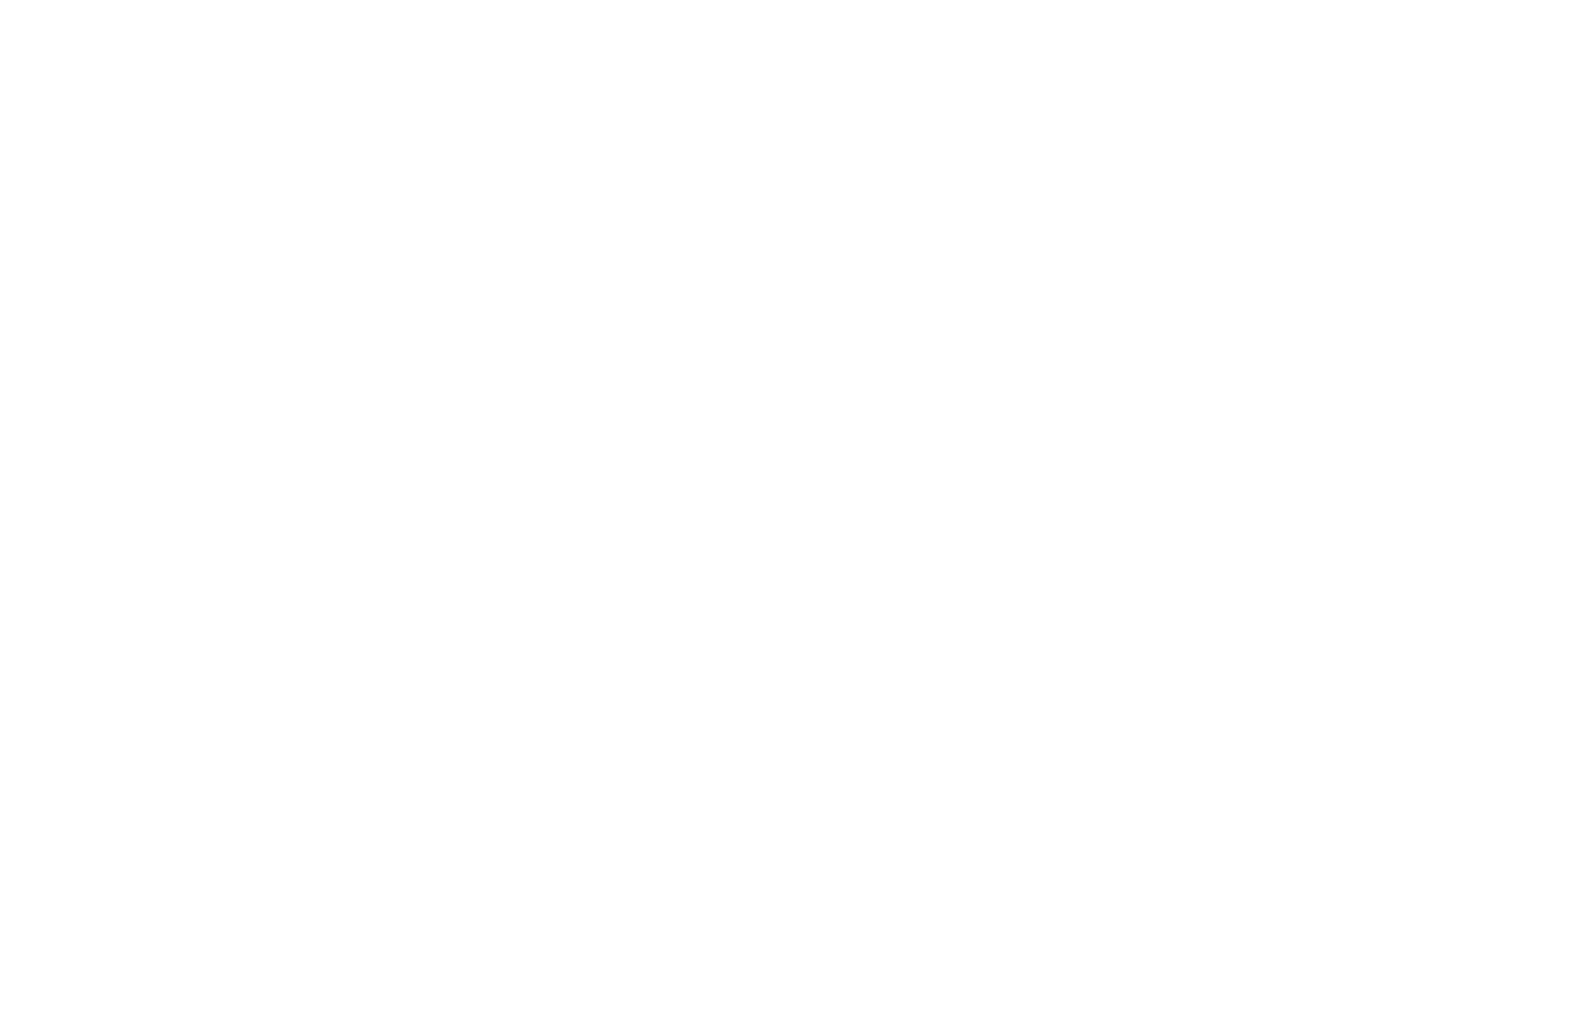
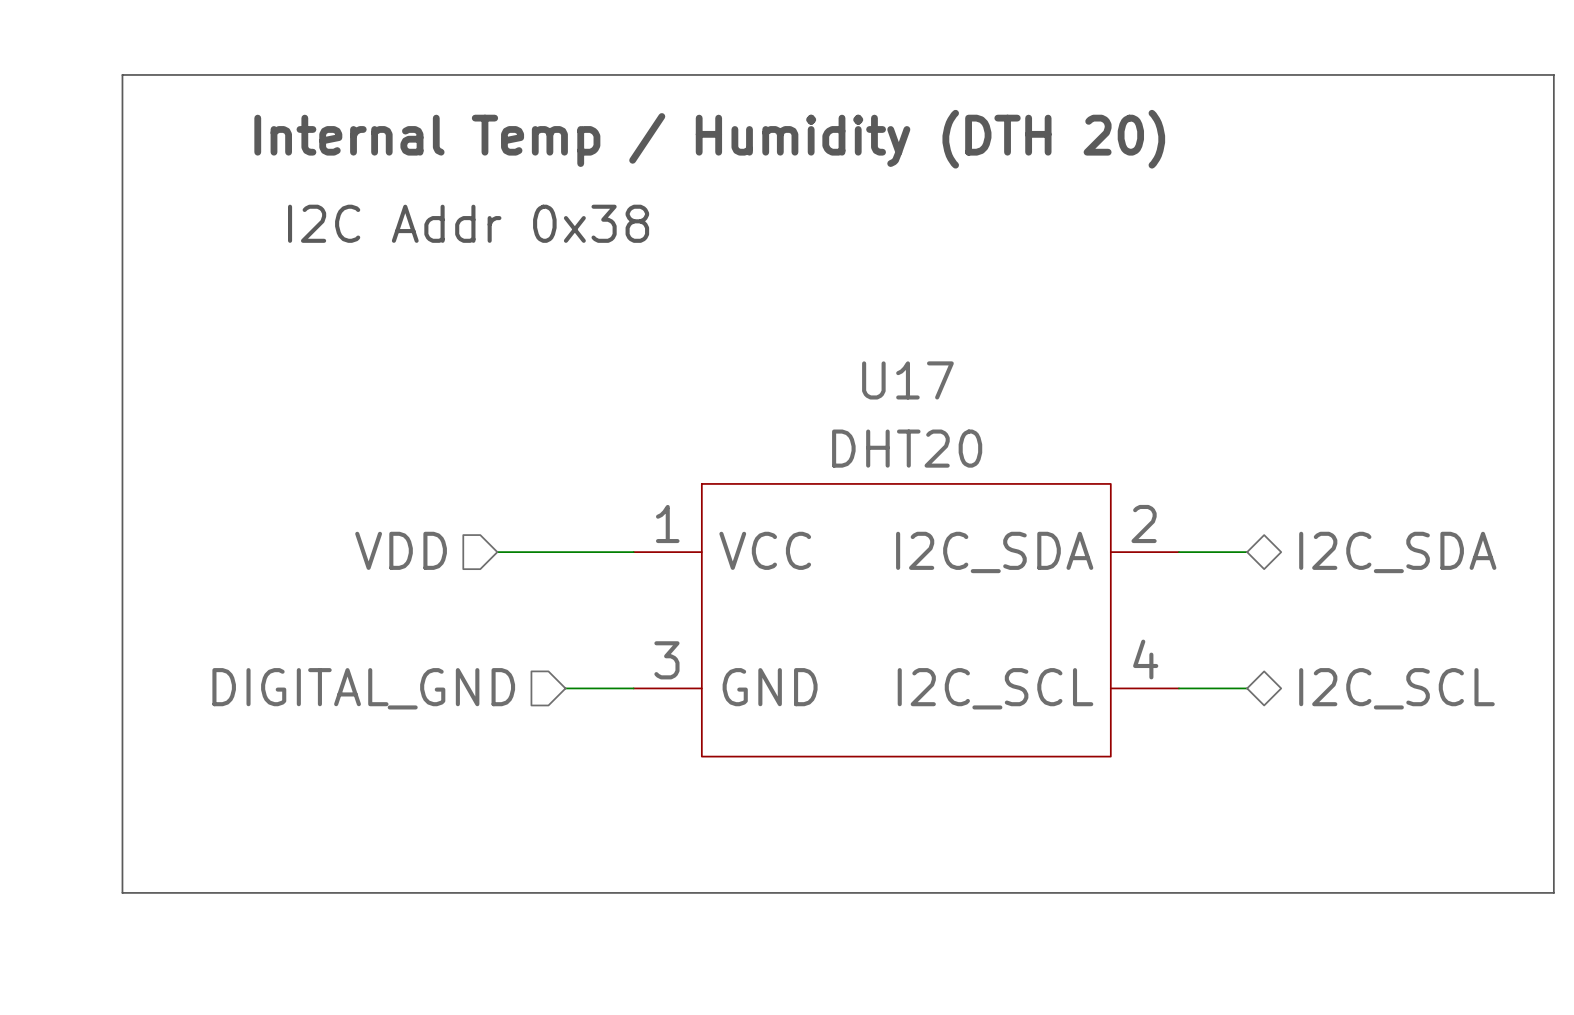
line: none -> (122, 74) (1553, 74) (1553, 892) (122, 892) (122, 74)
text: none -> Internal Temp / Humidity (DTH 20) (709, 139)
text: none -> I2C Addr 0x38 (468, 223)
hierarchical label: none -> VDD (401, 550)
wire: none -> (497, 552) (633, 552)
wire: none -> (1178, 552) (1247, 552)
hierarchical label: none -> I2C_SDA (1397, 552)
U17: none -> DHT20 (906, 620)
wire: none -> (565, 688) (633, 688)
wire: none -> (1178, 688) (1247, 688)
hierarchical label: none -> DIGITAL_GND (363, 688)
hierarchical label: none -> I2C_SCL (1396, 688)

